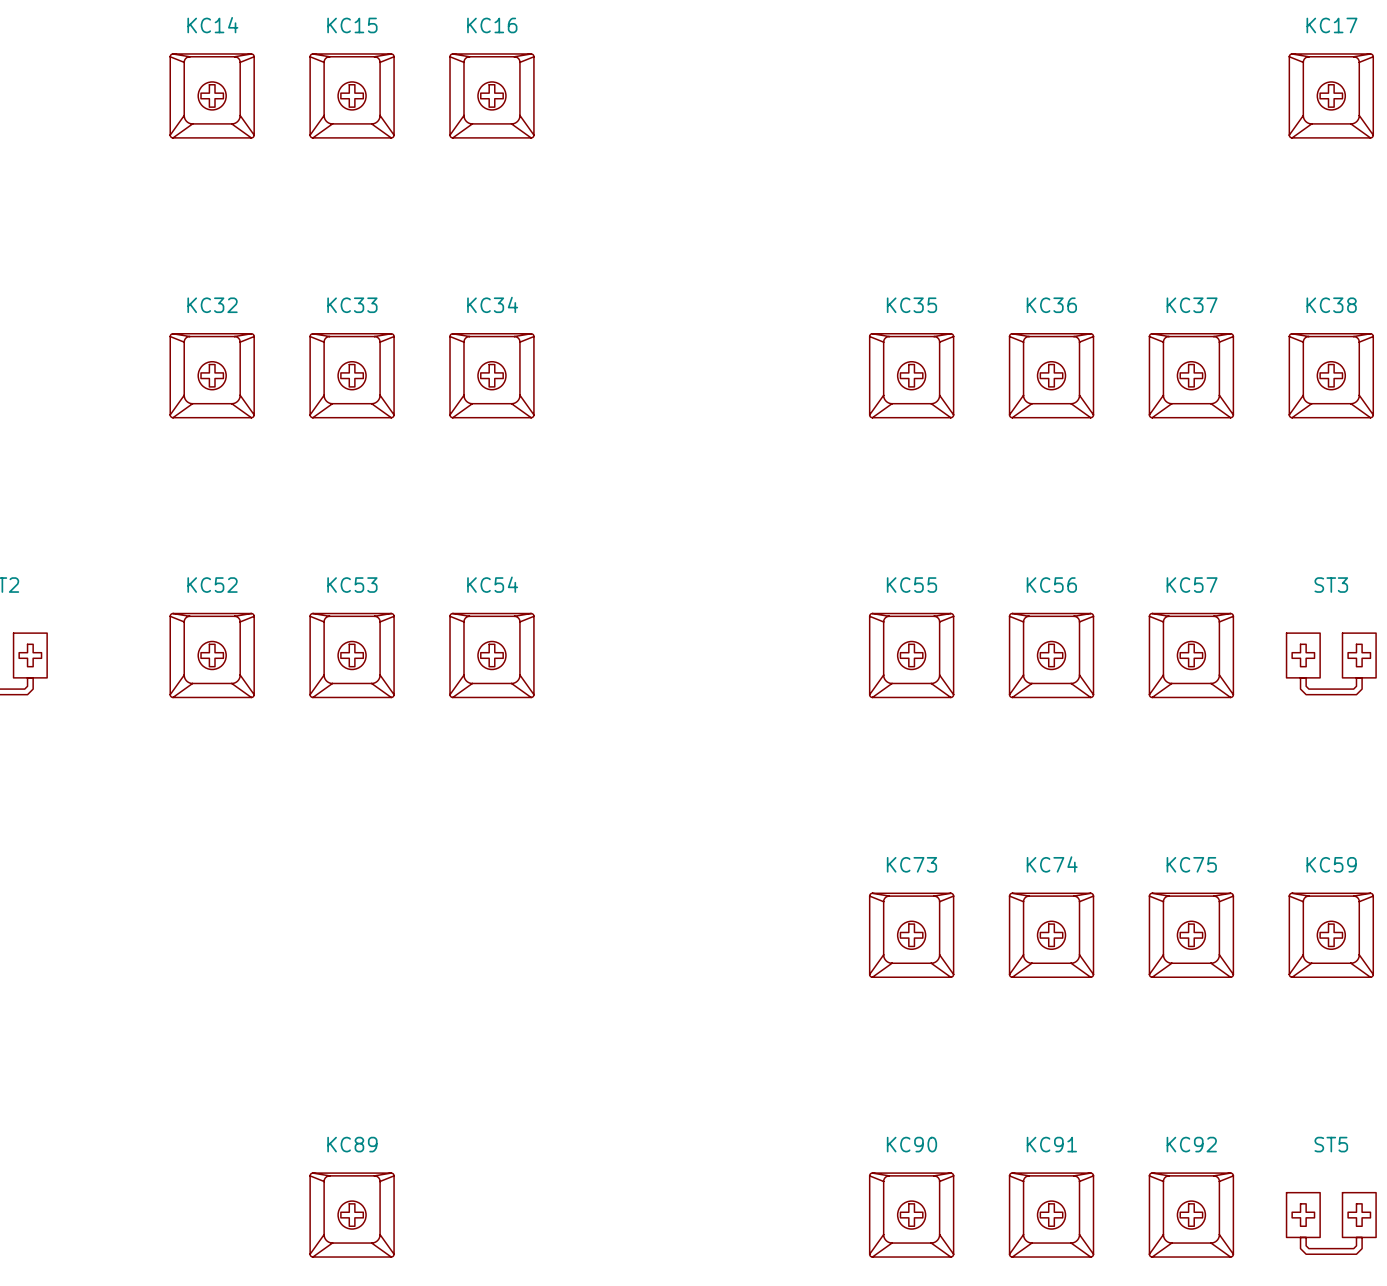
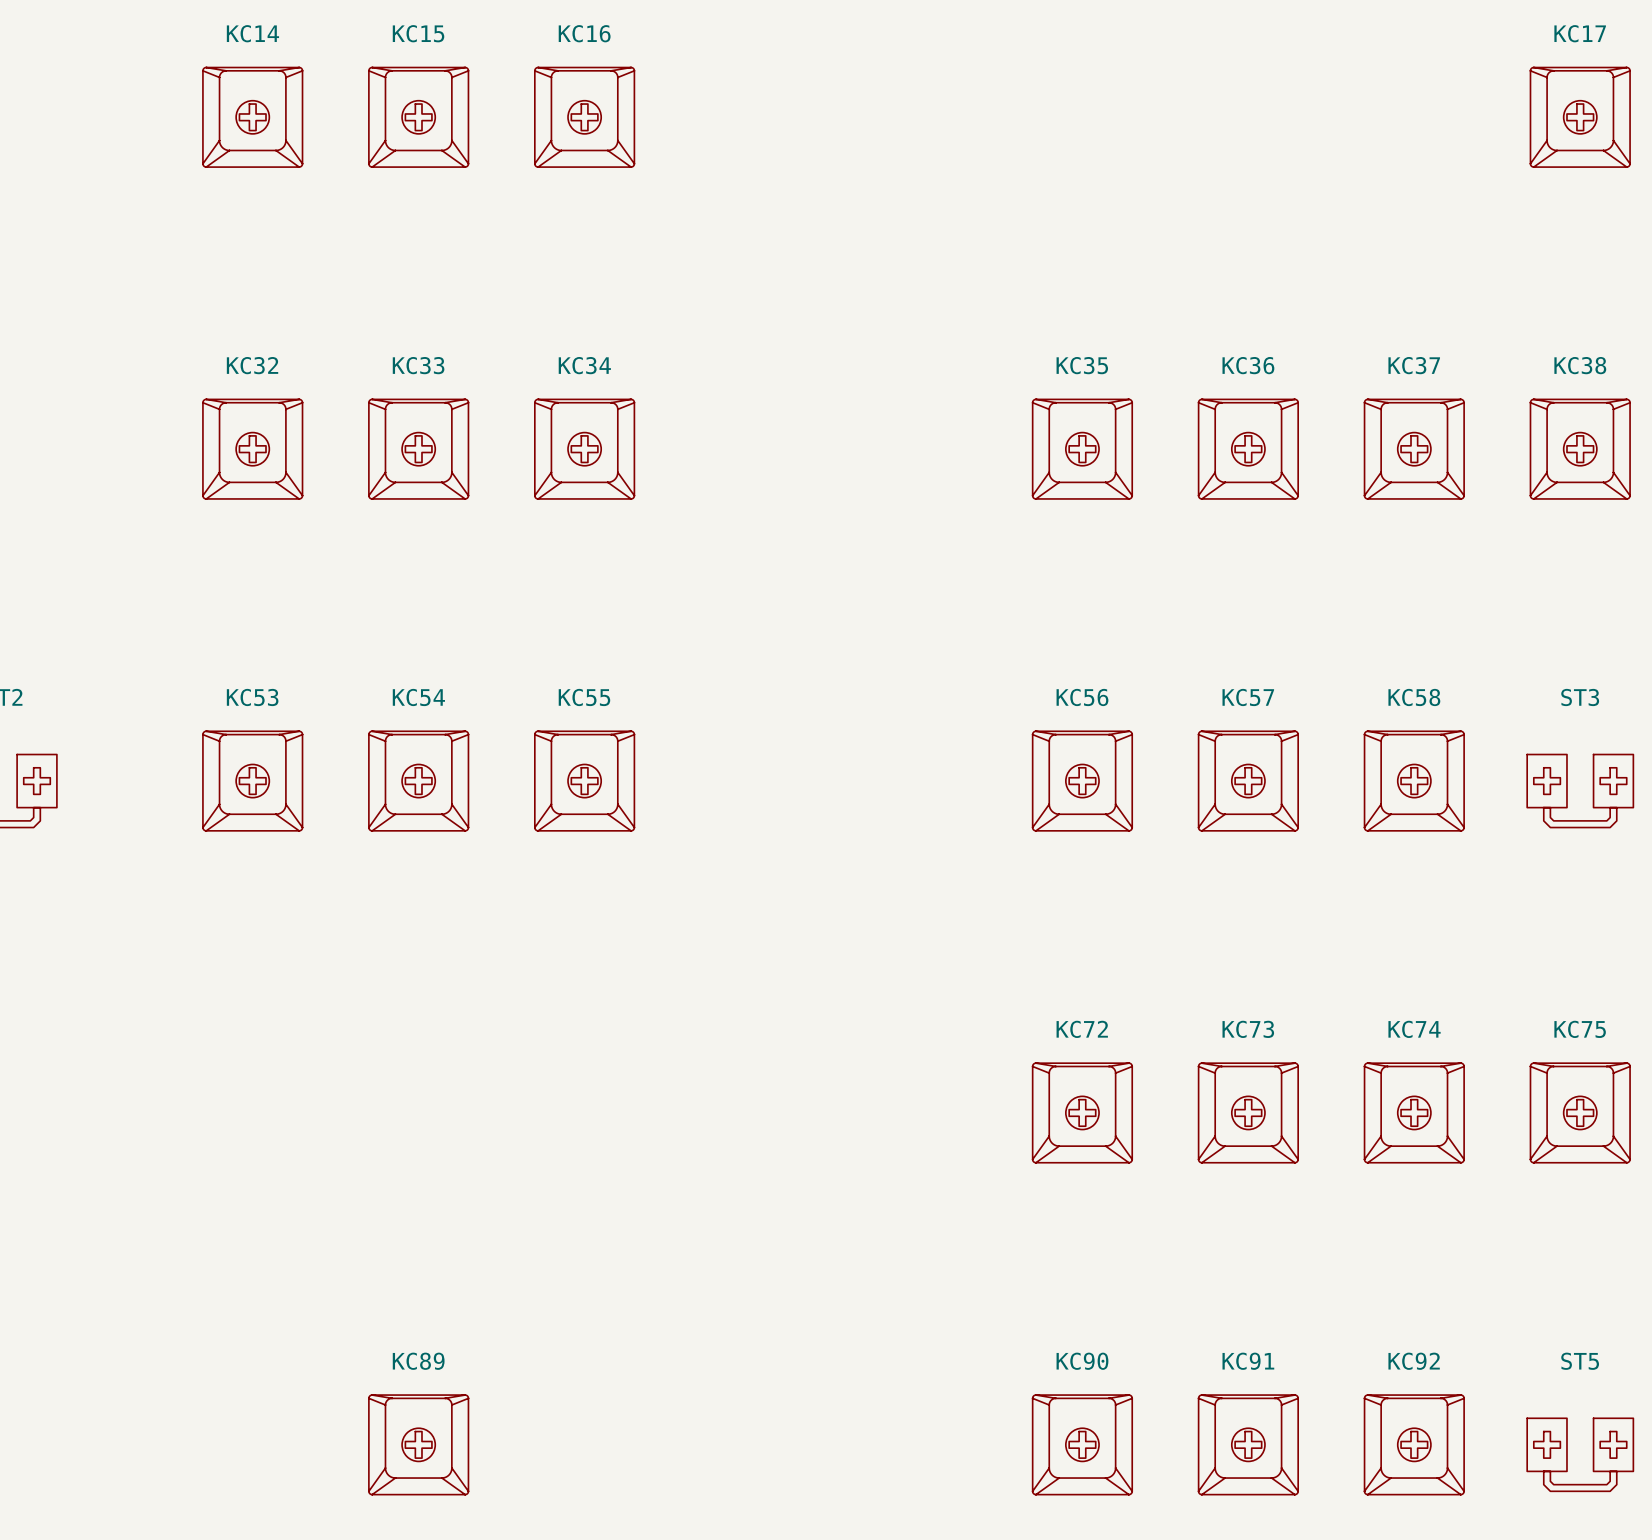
KC54 name: KC54 (492, 584) -> KC55 (584, 697)
KC52 name: KC52 (212, 585) -> KC53 (252, 697)
KC53 name: KC53 (352, 585) -> KC54 (418, 697)
KC55 name: KC55 (911, 585) -> KC56 (1082, 697)
KC56 name: KC56 (1051, 585) -> KC57 (1248, 697)
KC57 name: KC57 (1192, 585) -> KC58 (1414, 697)
KC73 name: KC73 (911, 864) -> KC72 (1082, 1029)
KC74 name: KC74 (1052, 864) -> KC73 (1248, 1029)
KC75 name: KC75 (1191, 864) -> KC74 (1414, 1029)
KC59 name: KC59 (1331, 864) -> KC75 (1580, 1029)

